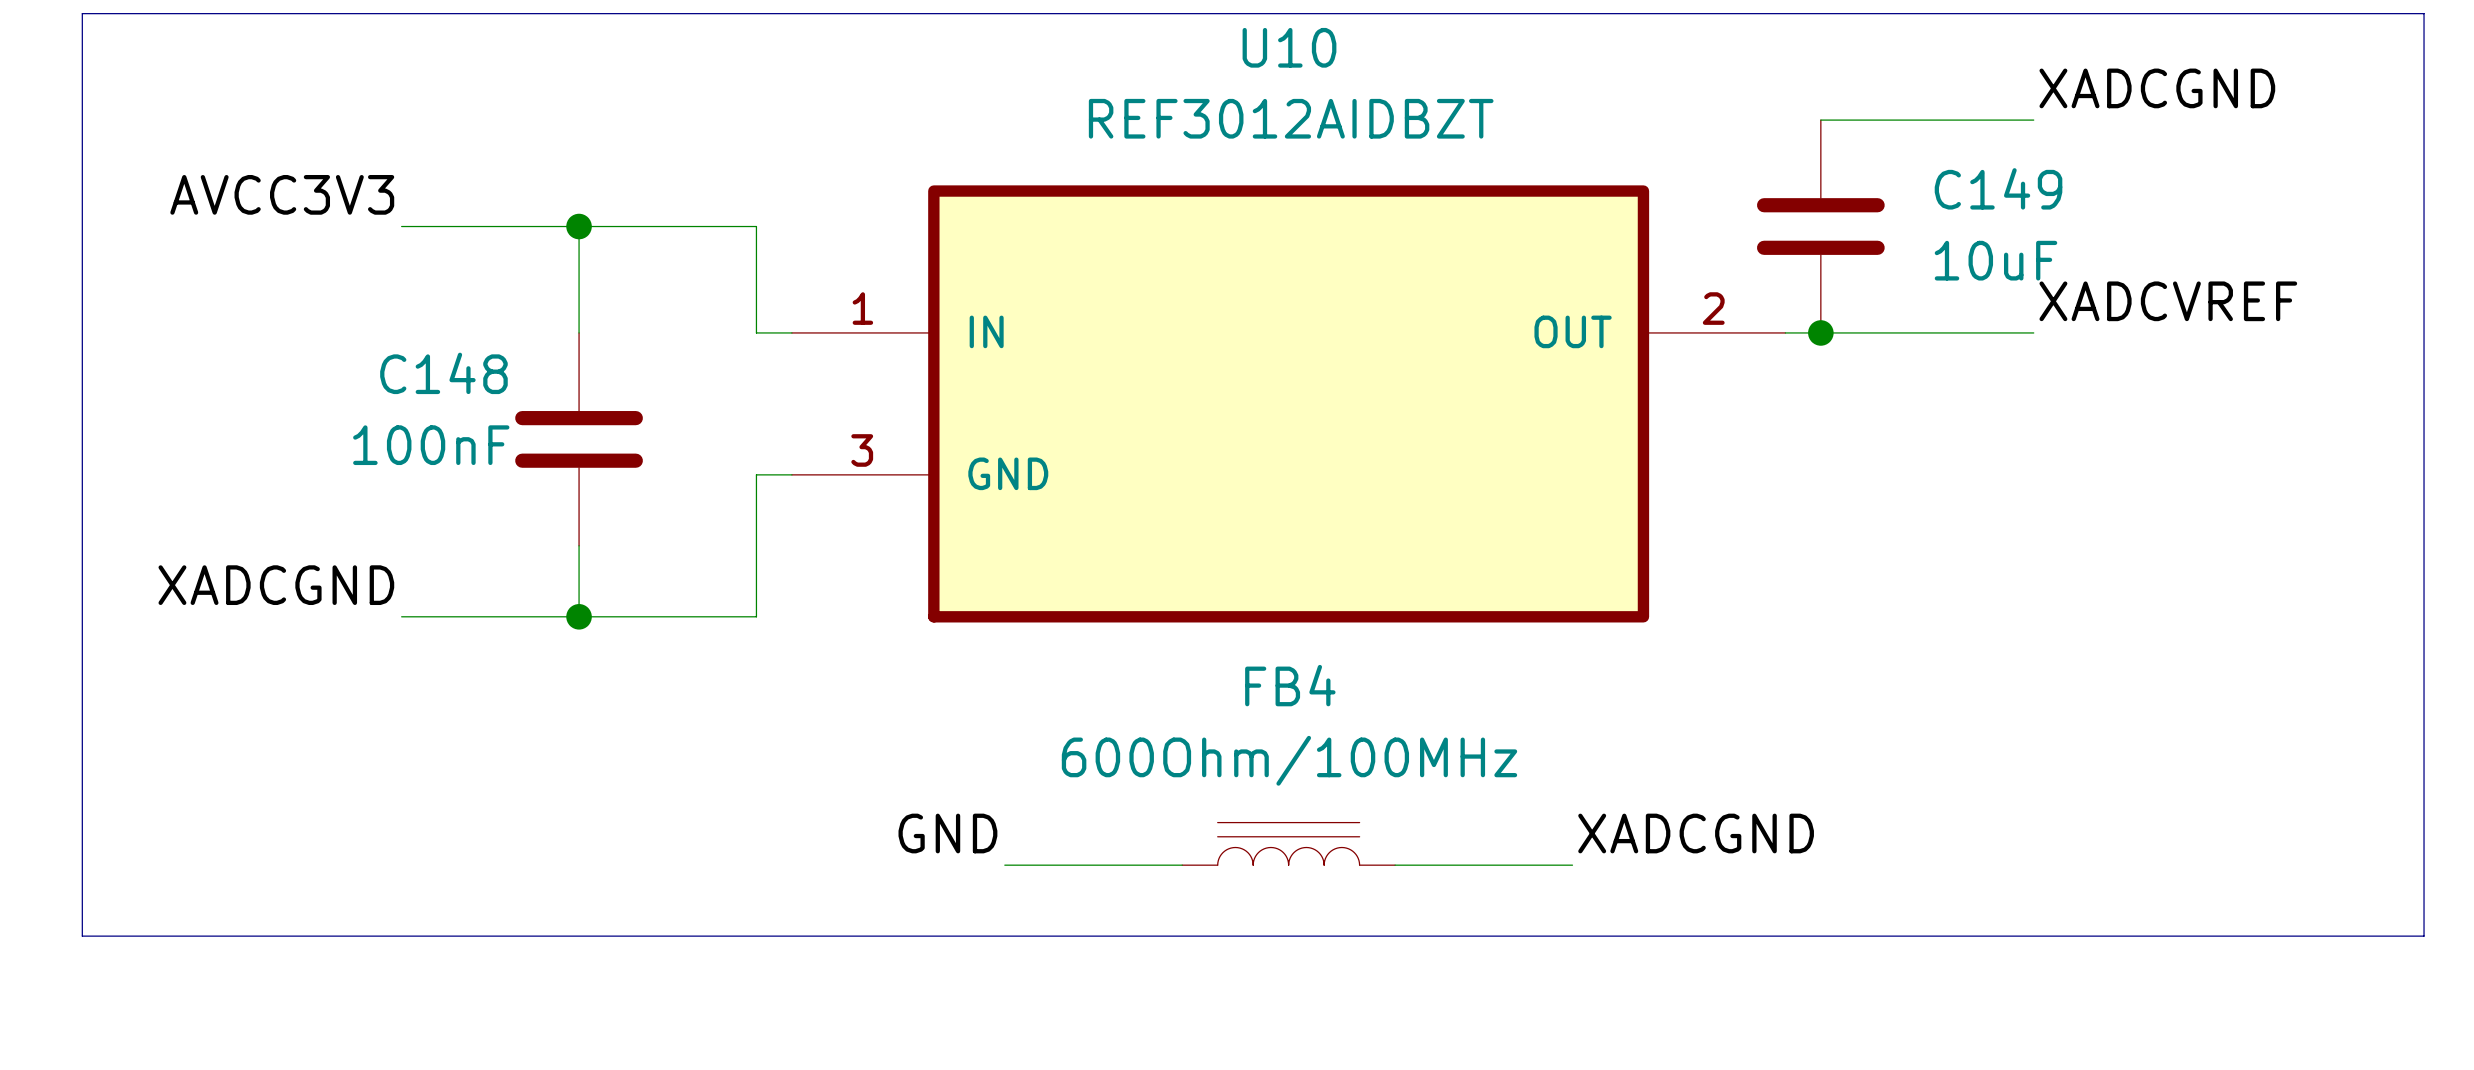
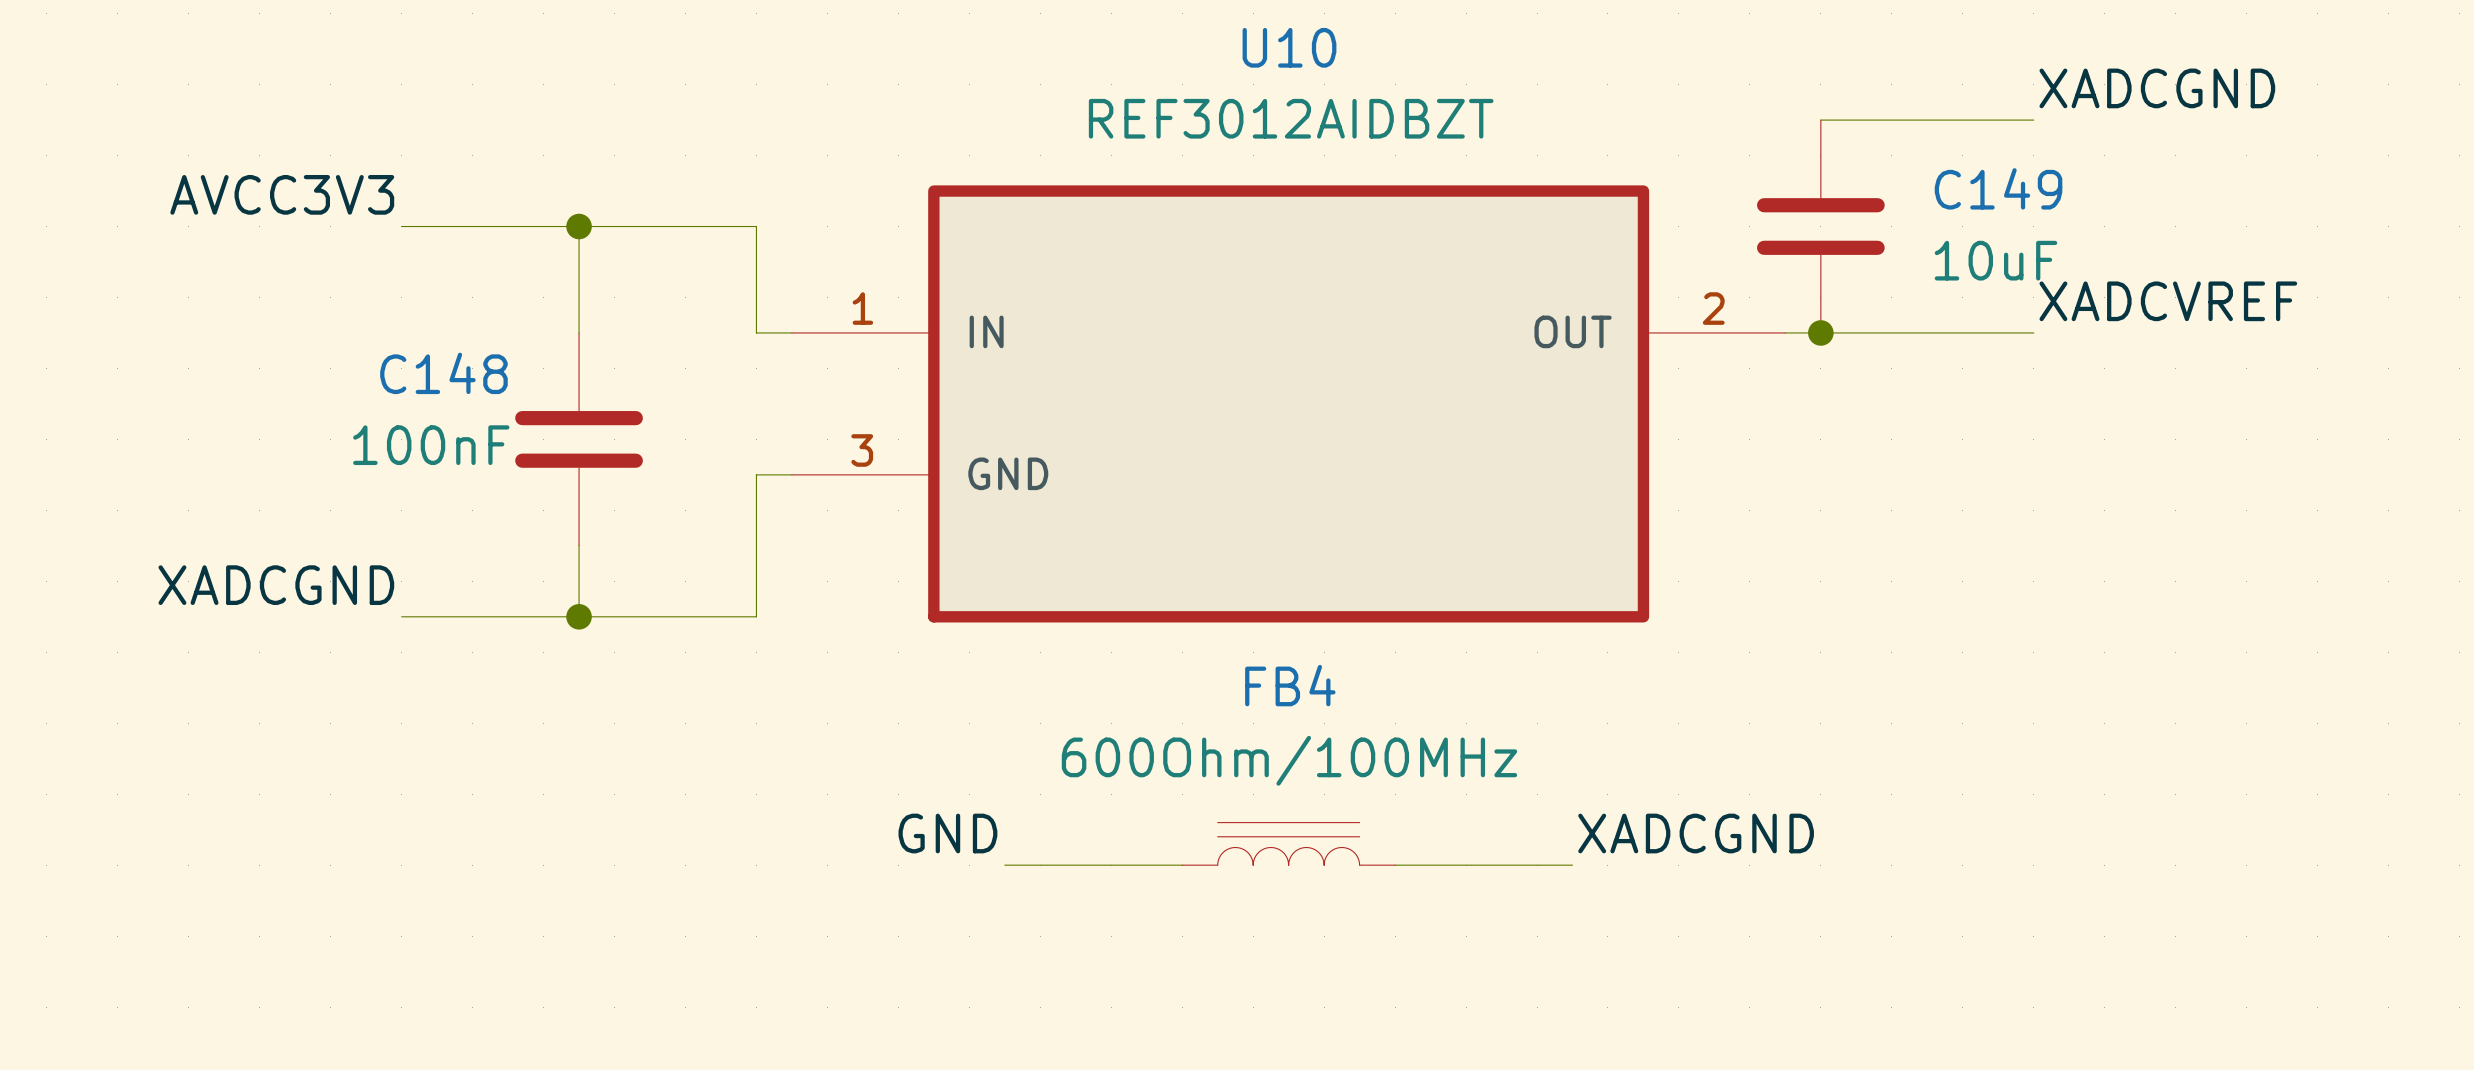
line: (82, 13) (2424, 13) (2424, 936) (82, 936) (82, 13) -> none

